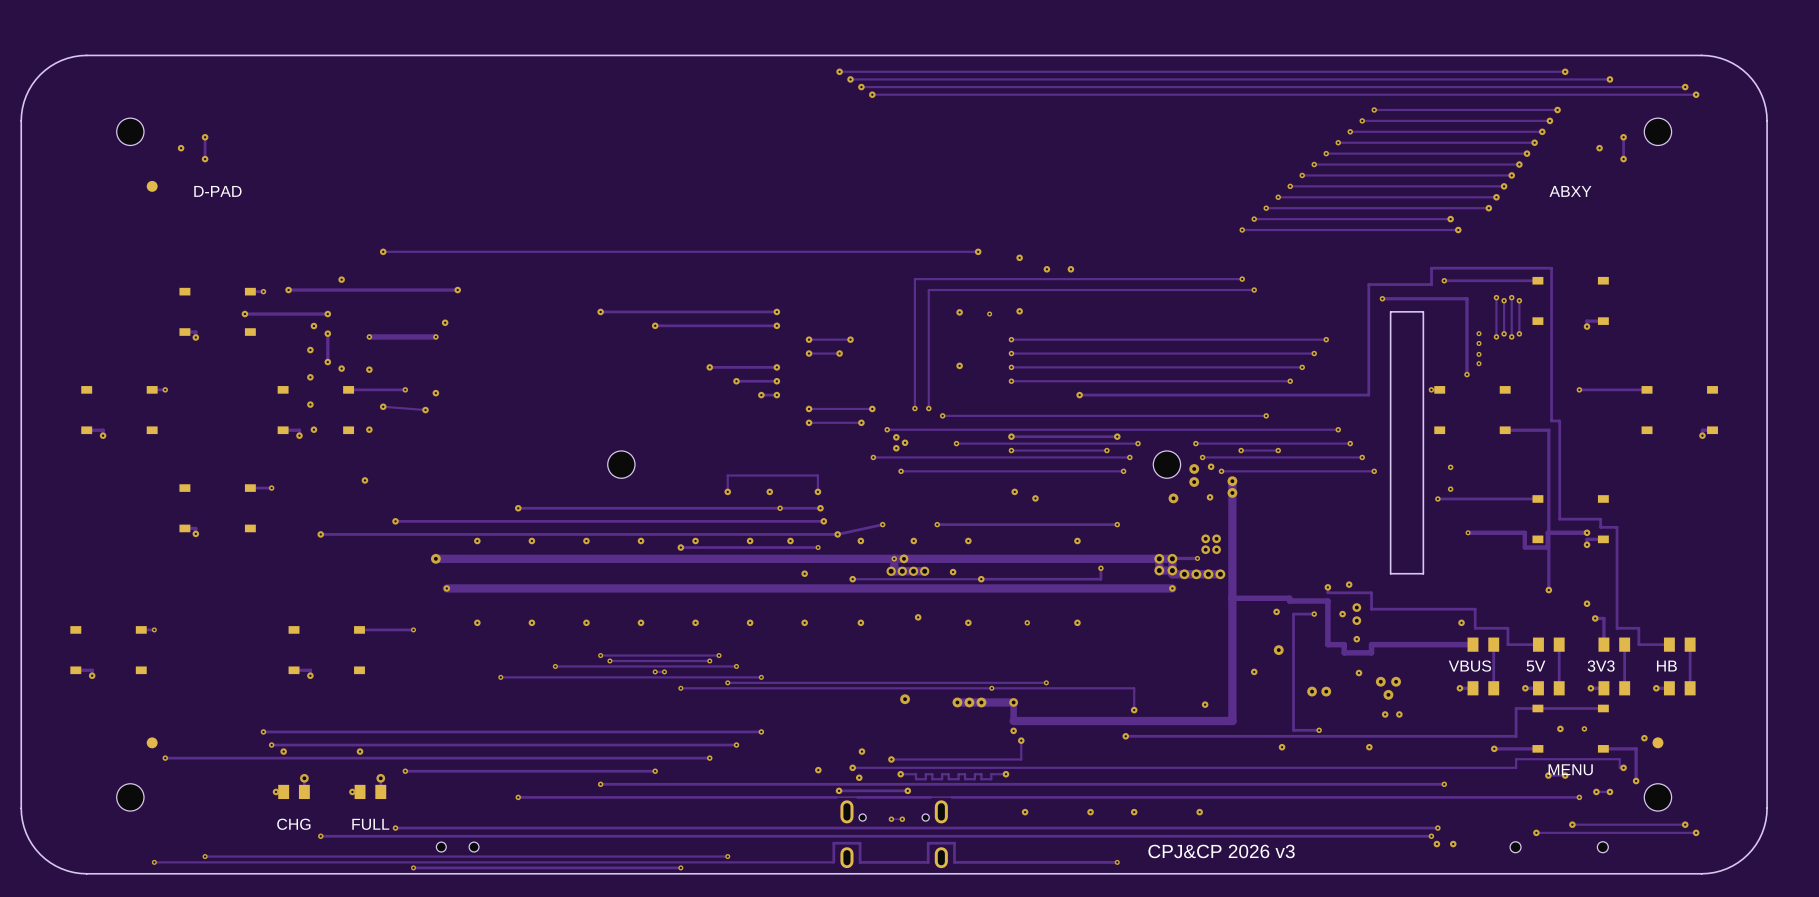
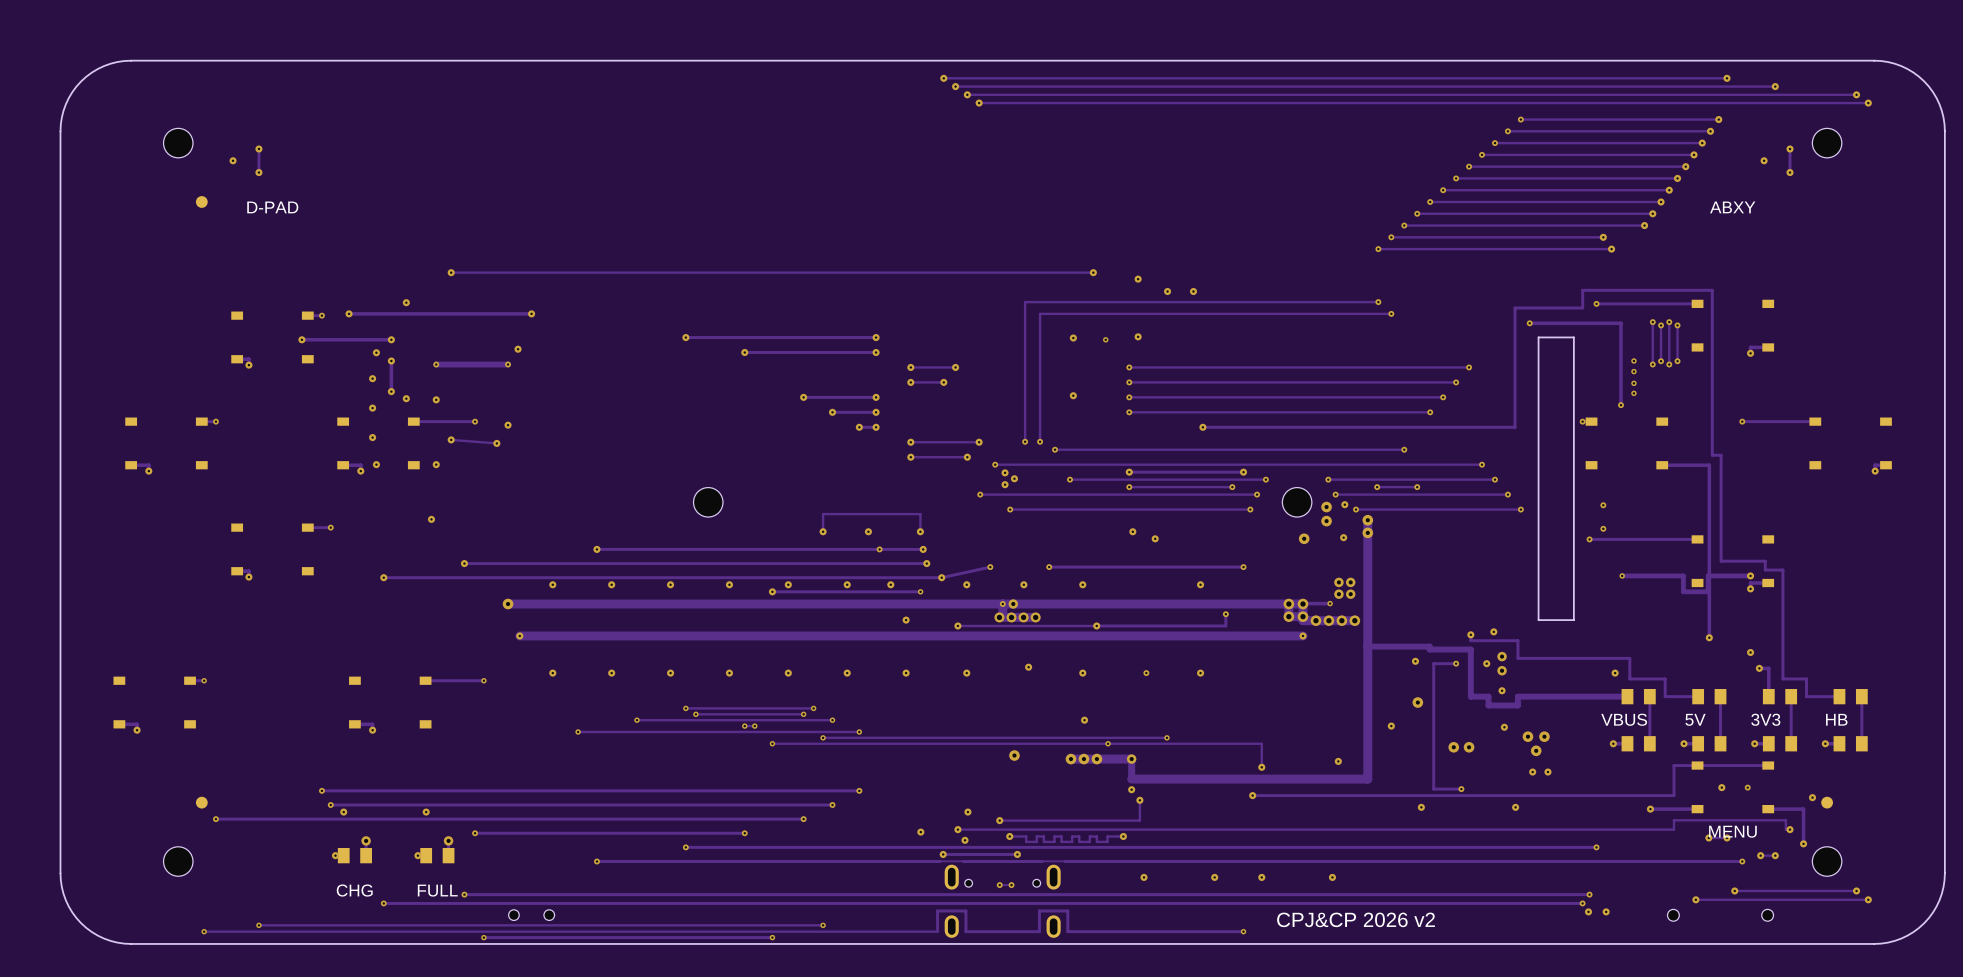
via: (953, 572) -> none
via: none -> (1084, 720)
text: CPJ&CP 2026 v3 (1221, 851) -> CPJ&CP 2026 v2 (1356, 919)

